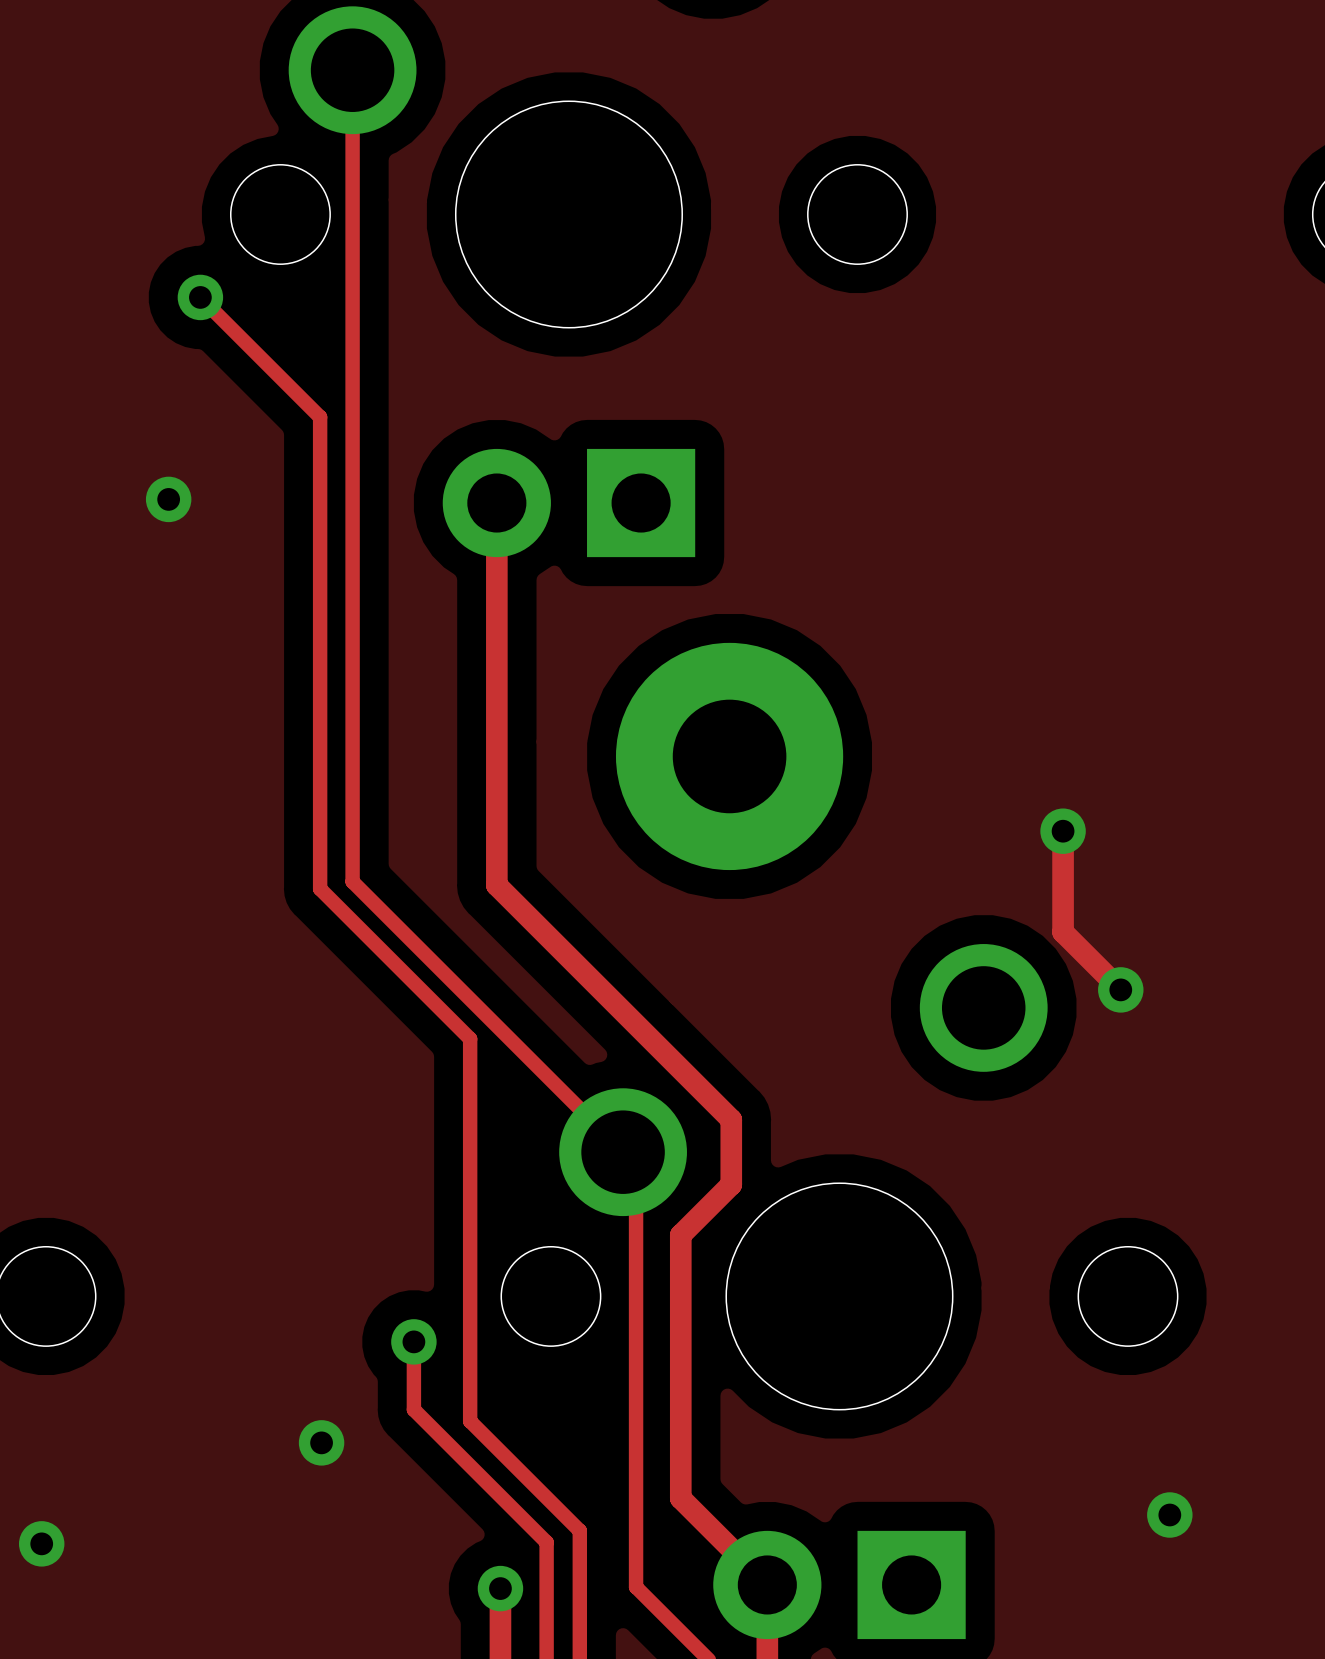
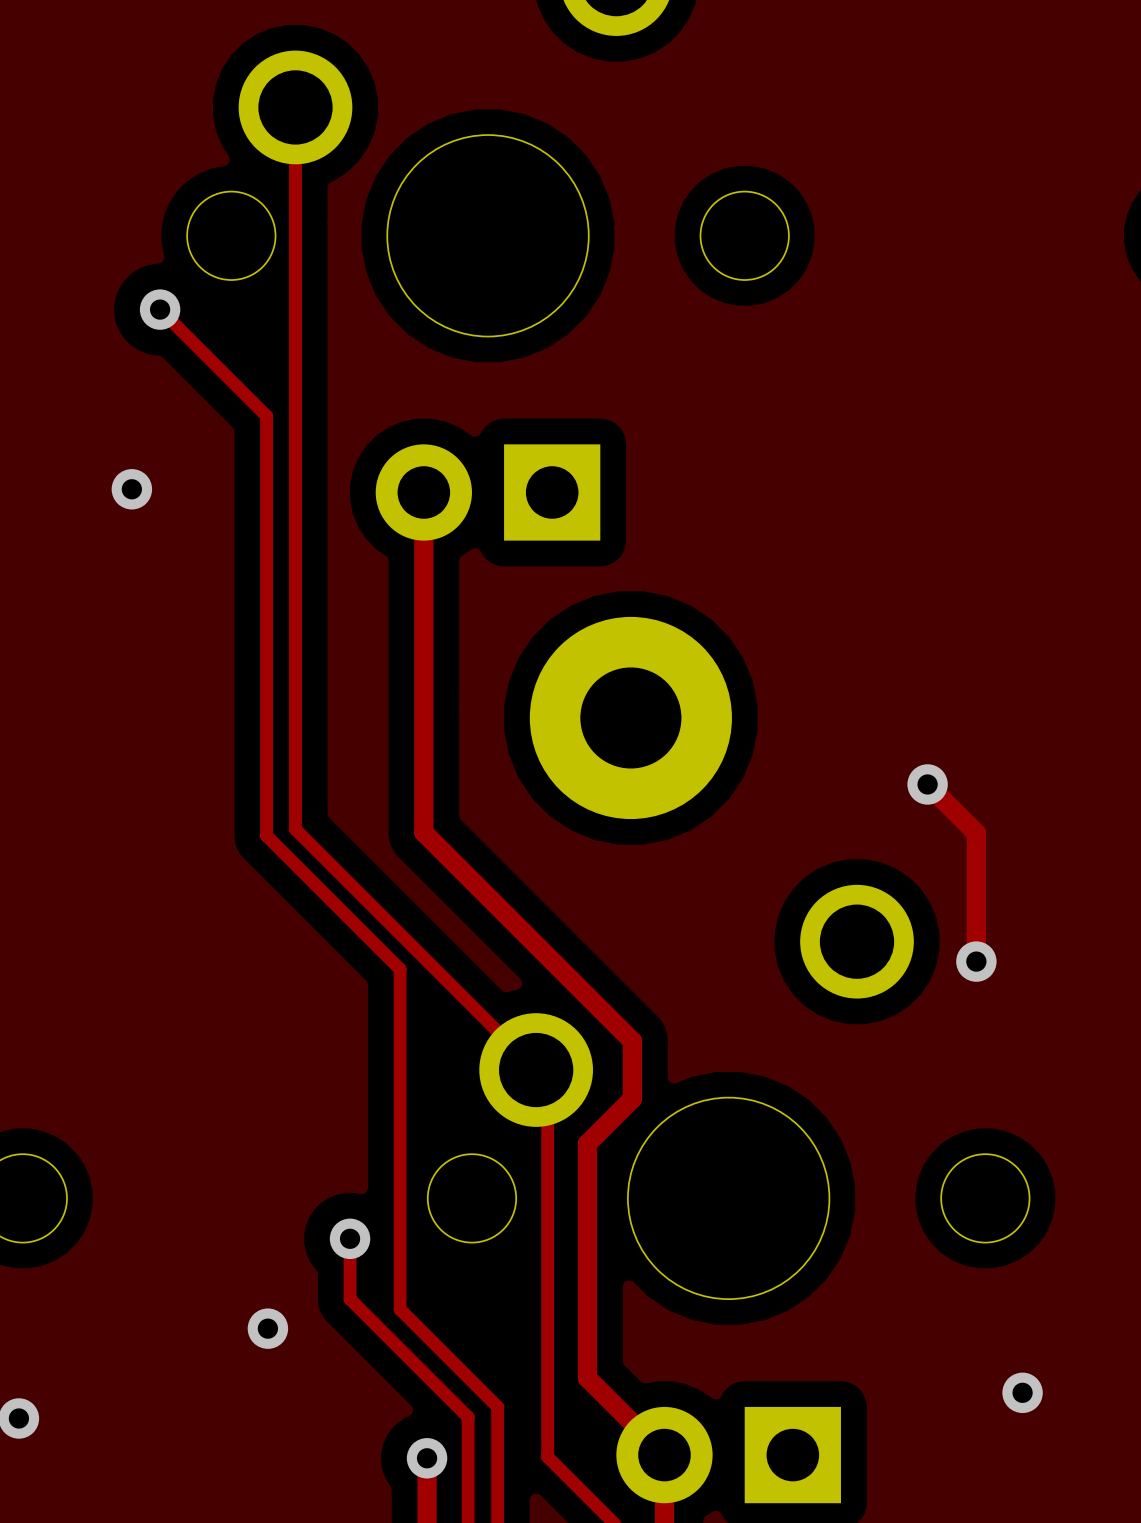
track: (1063, 831) (1063, 932) (1120, 989) -> (927, 784) (976, 833) (976, 961)
via position: (1120, 989) -> (976, 961)

